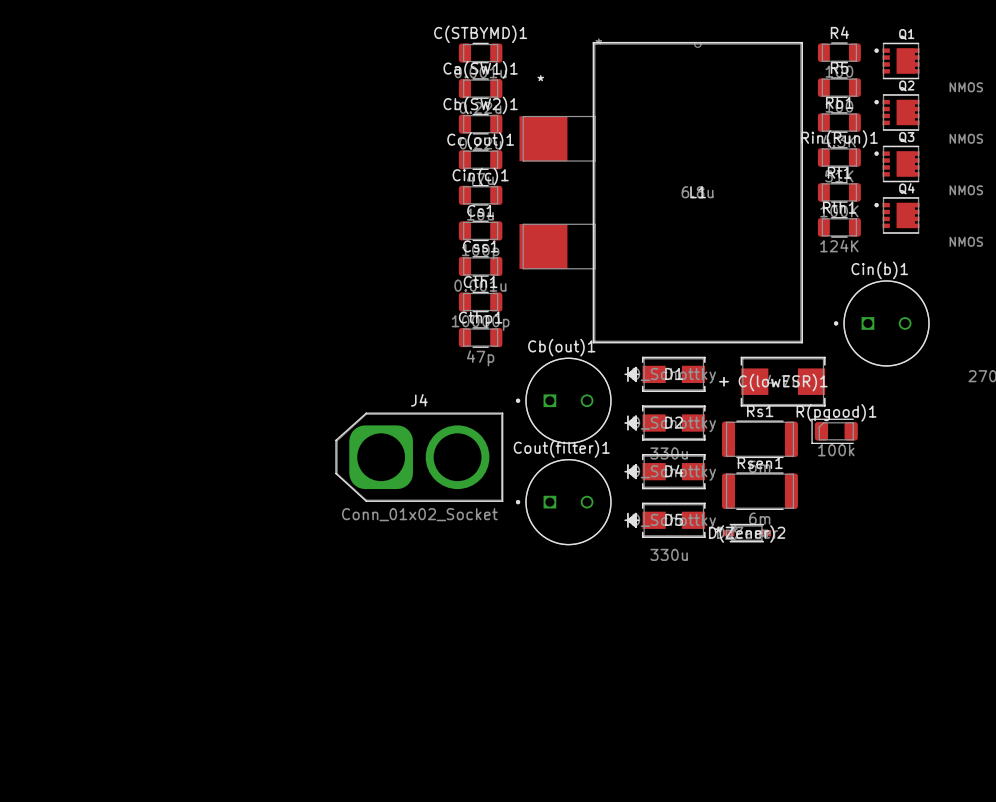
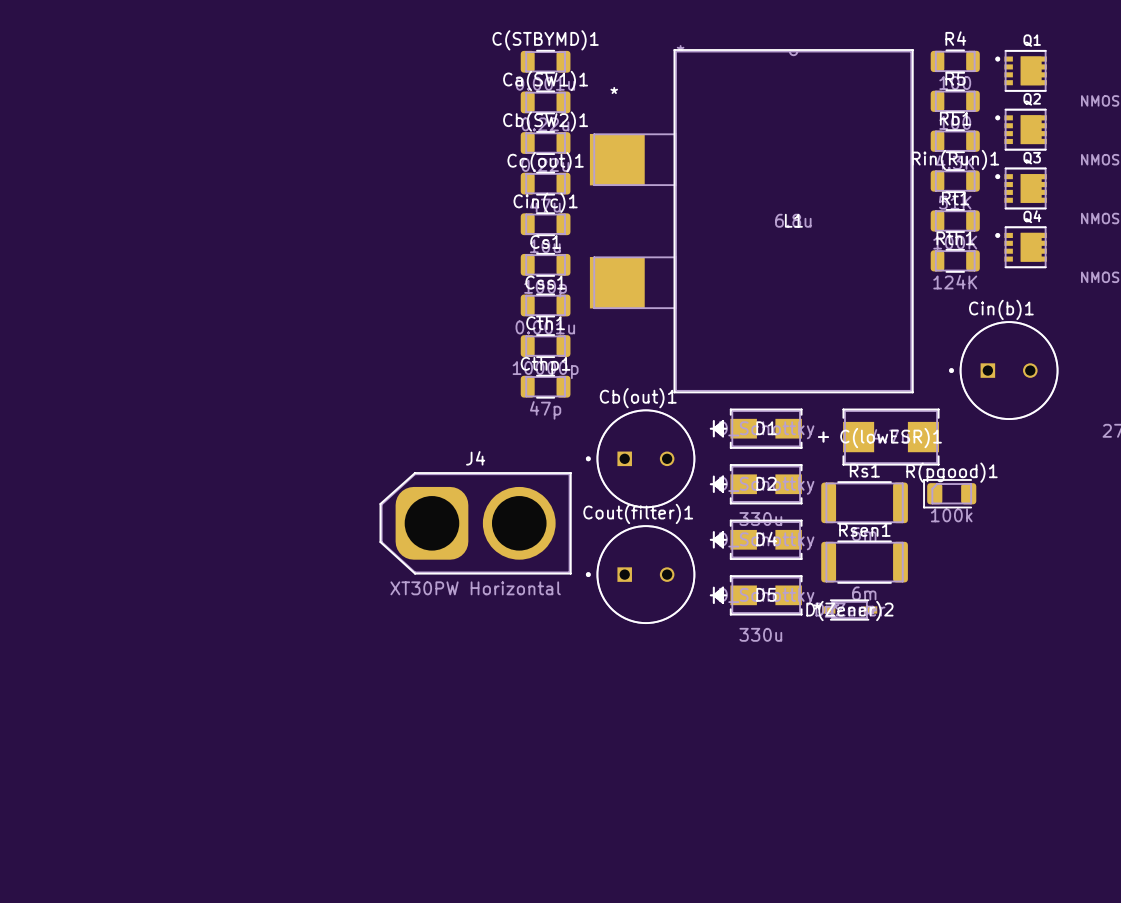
J4 value: Conn_01x02_Socket (419, 514) -> XT30PW Horizontal (475, 588)

